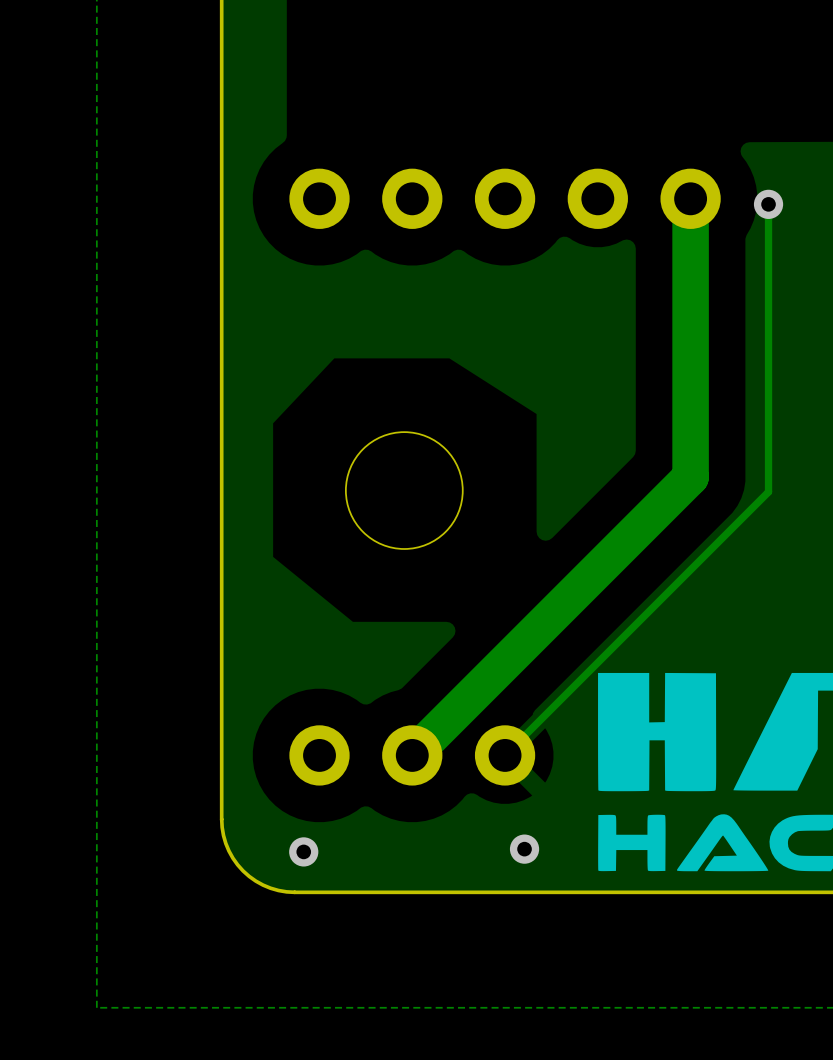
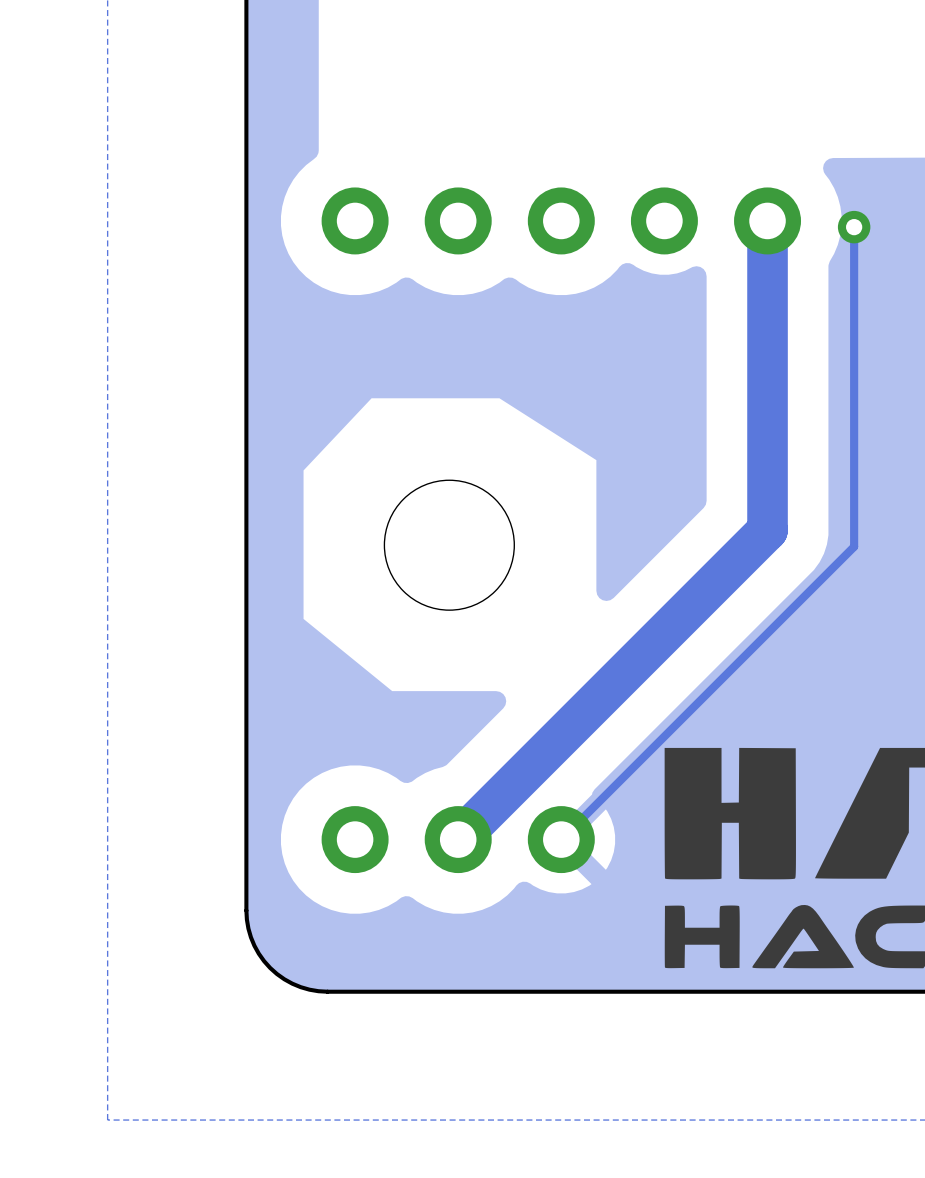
via: (524, 849) -> none
via: (303, 851) -> none

